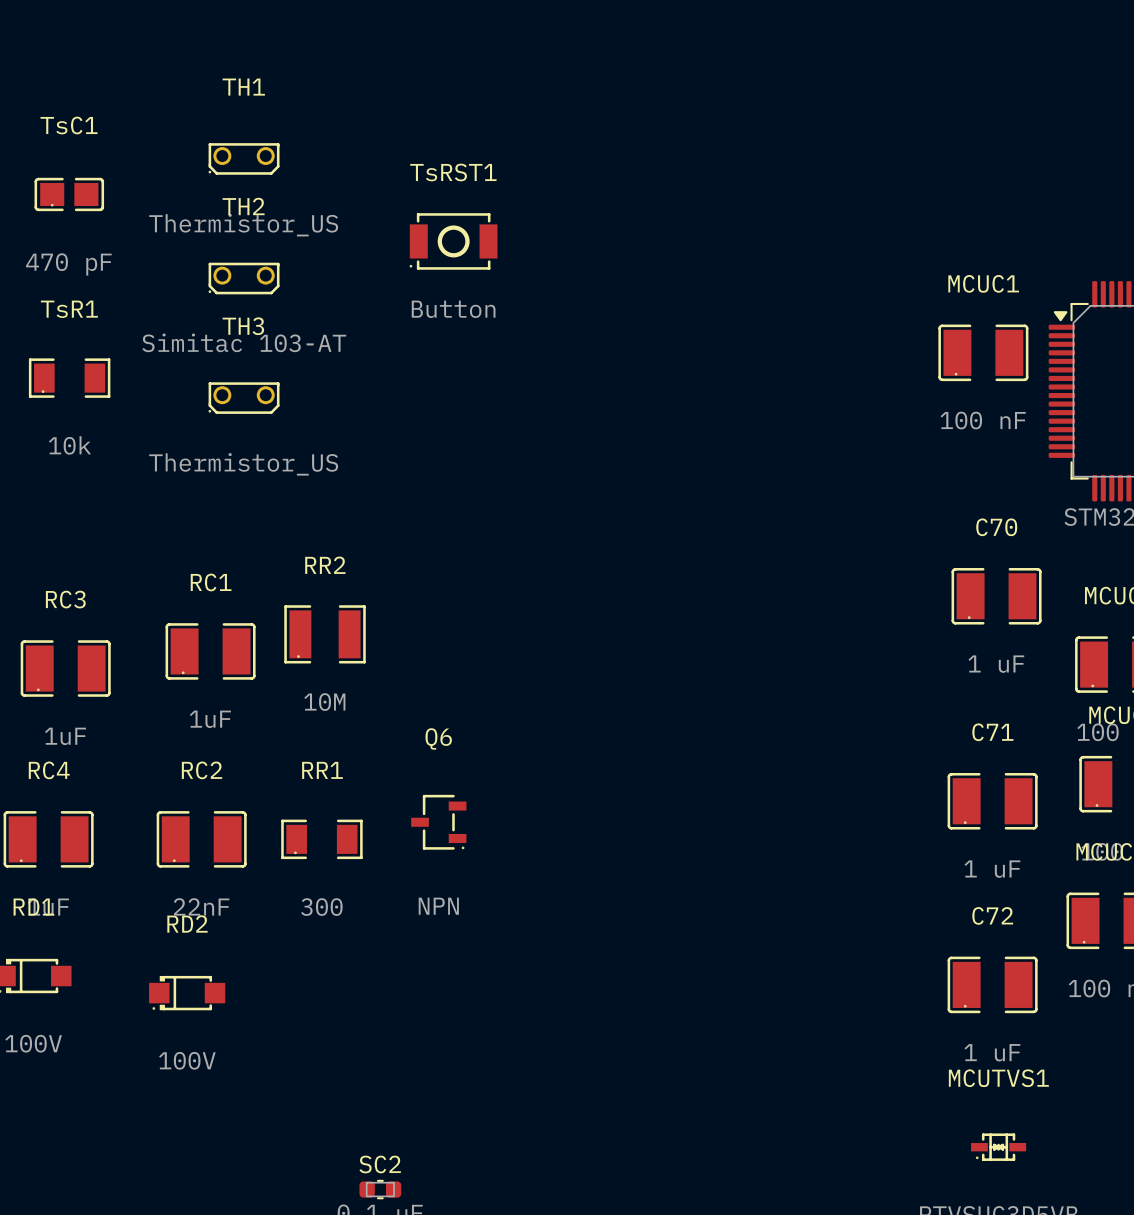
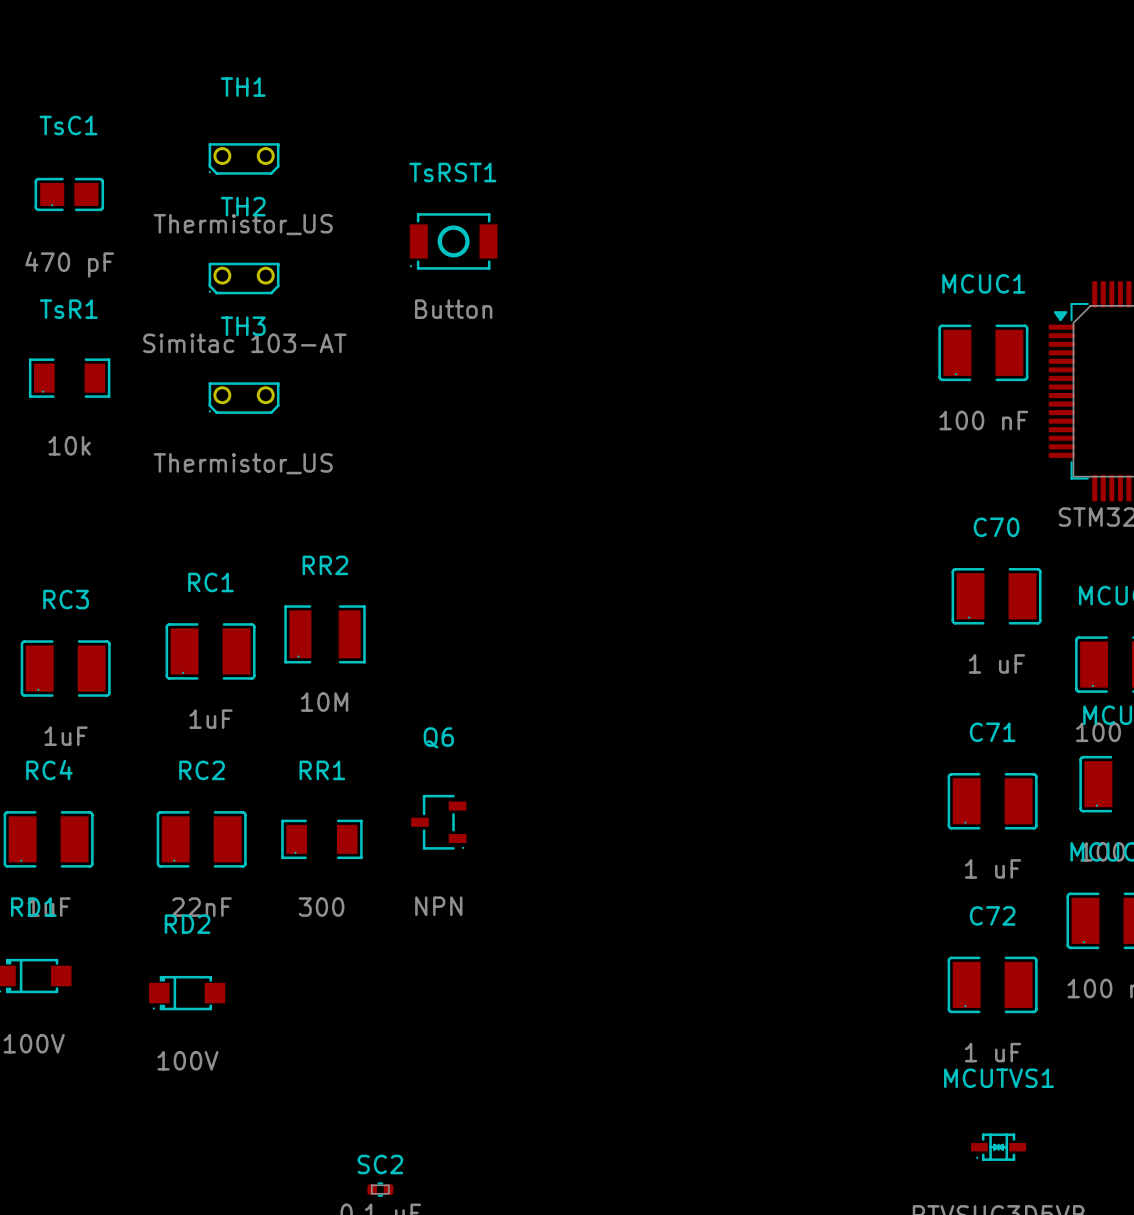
SC2 footprint: [359, 1179, 402, 1200] -> [367, 1182, 394, 1197]

